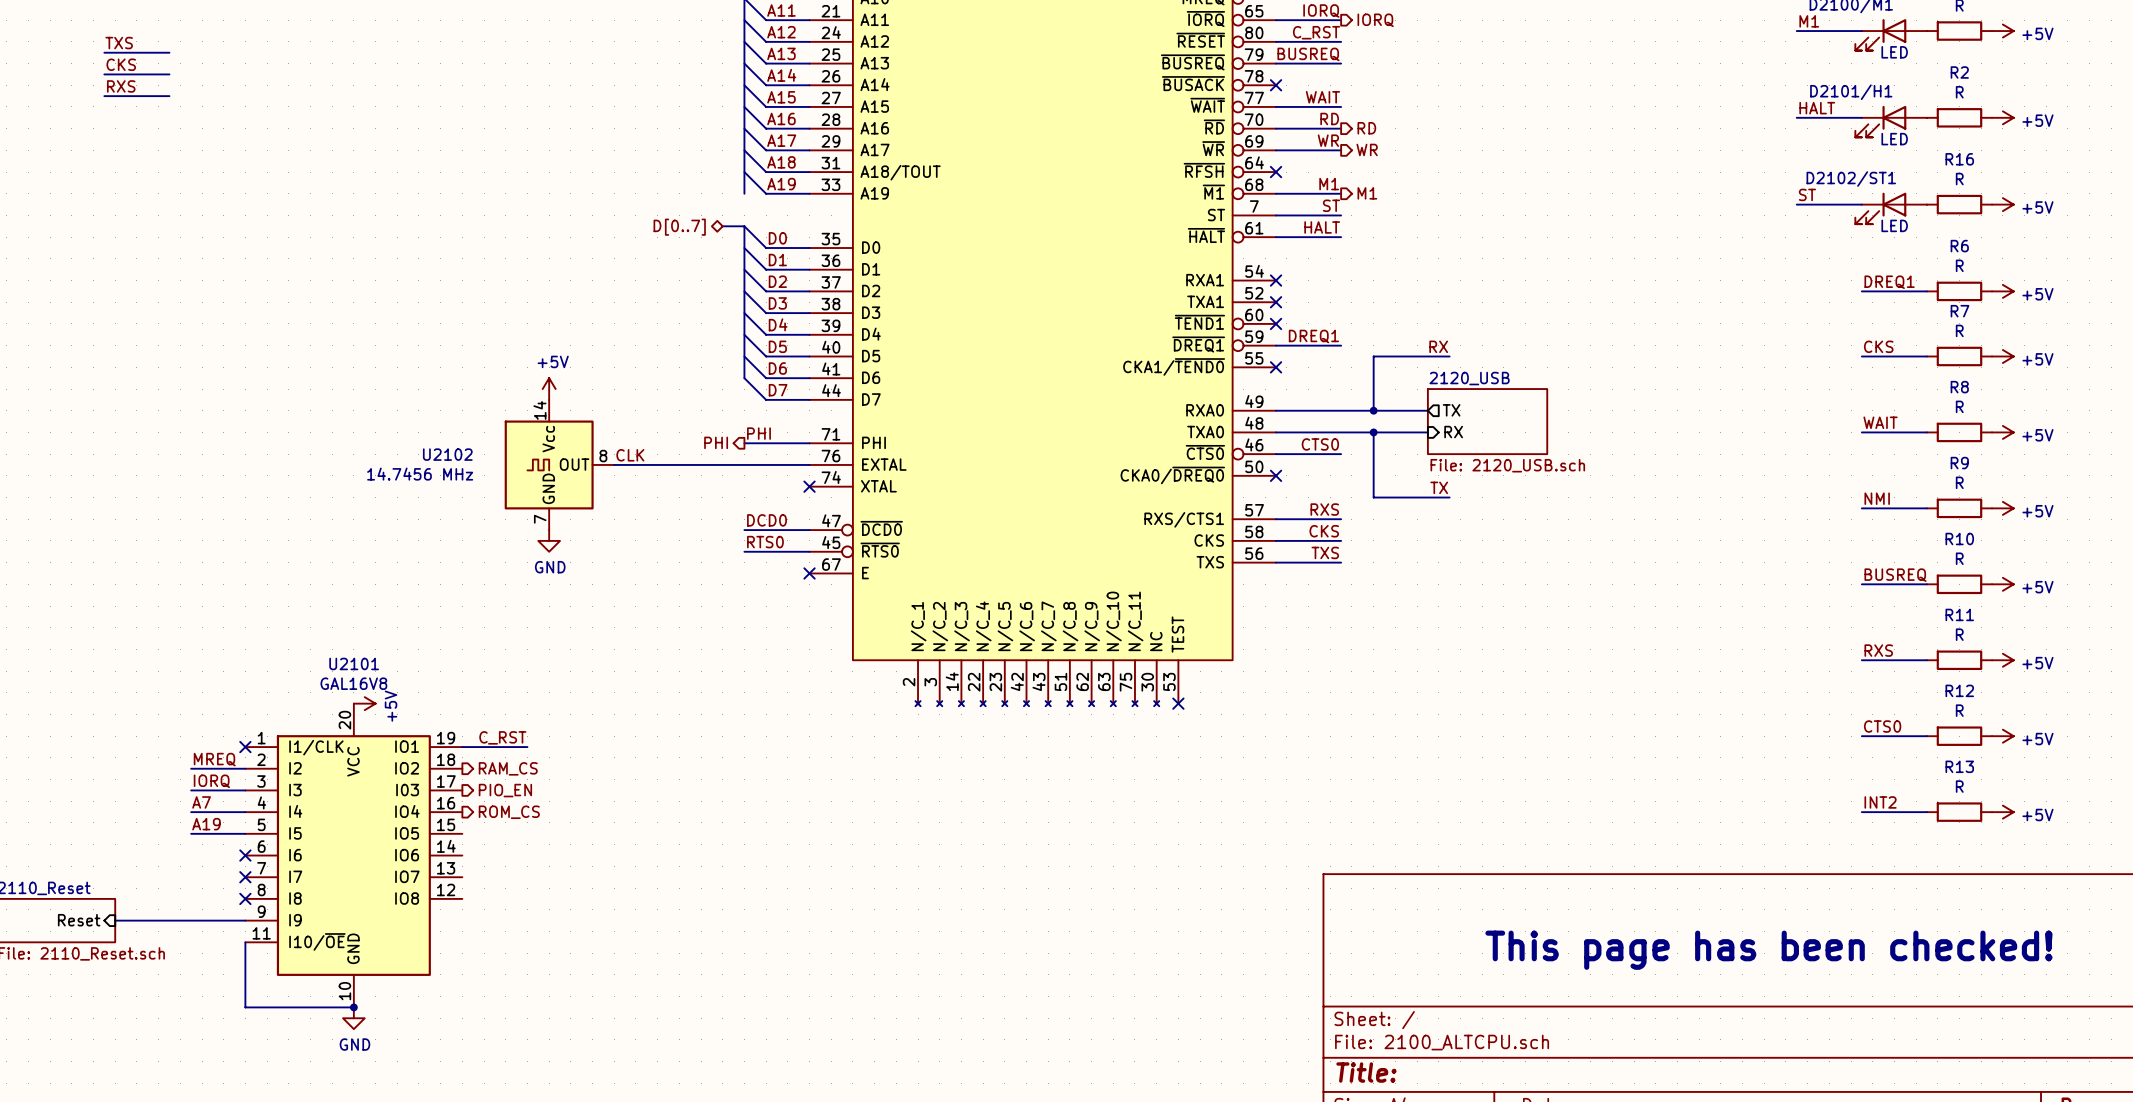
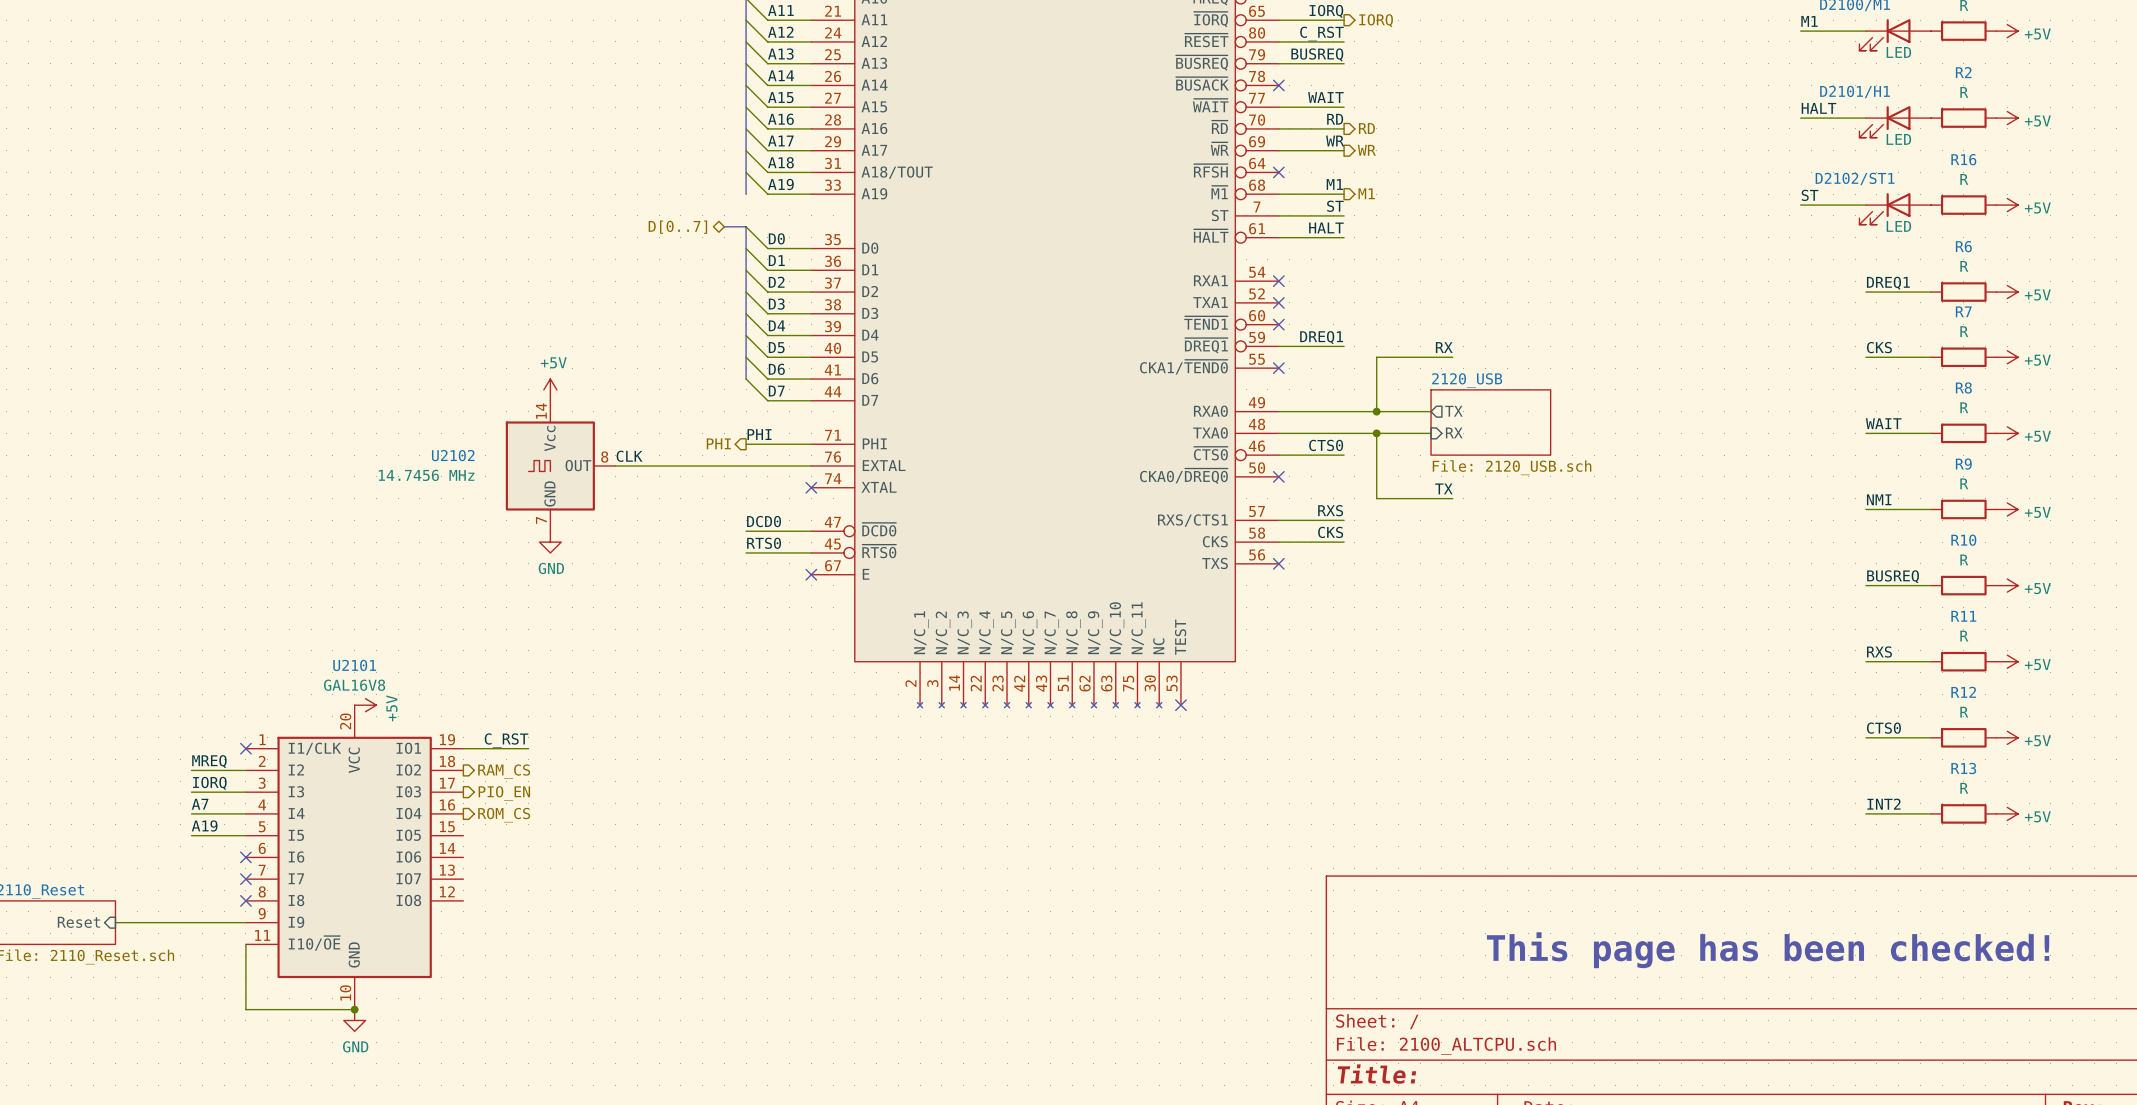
label: TXS (119, 43) -> none
wire: (104, 52) (169, 52) -> none
label: CKS (121, 64) -> none
wire: (104, 74) (169, 74) -> none
label: RXS (121, 86) -> none
wire: (104, 96) (169, 96) -> none
label: TXS (1325, 552) -> none
wire: (1276, 562) (1341, 562) -> none
no-connect mark: none -> (1278, 563)

